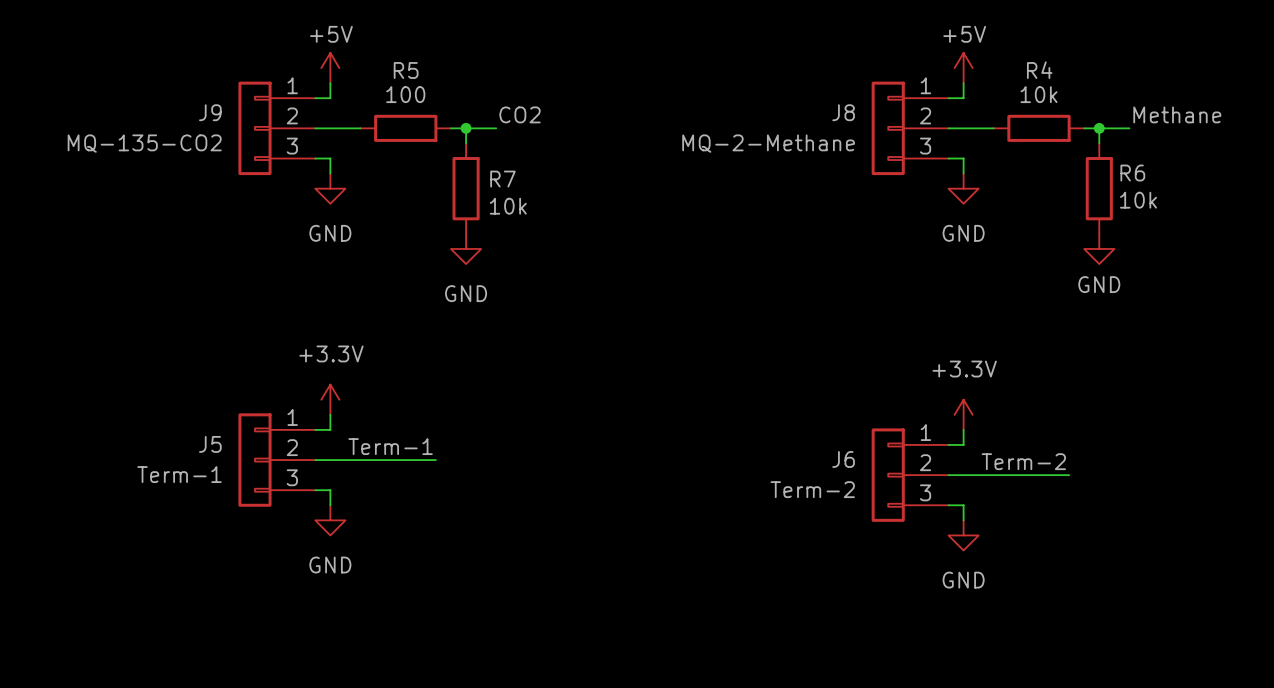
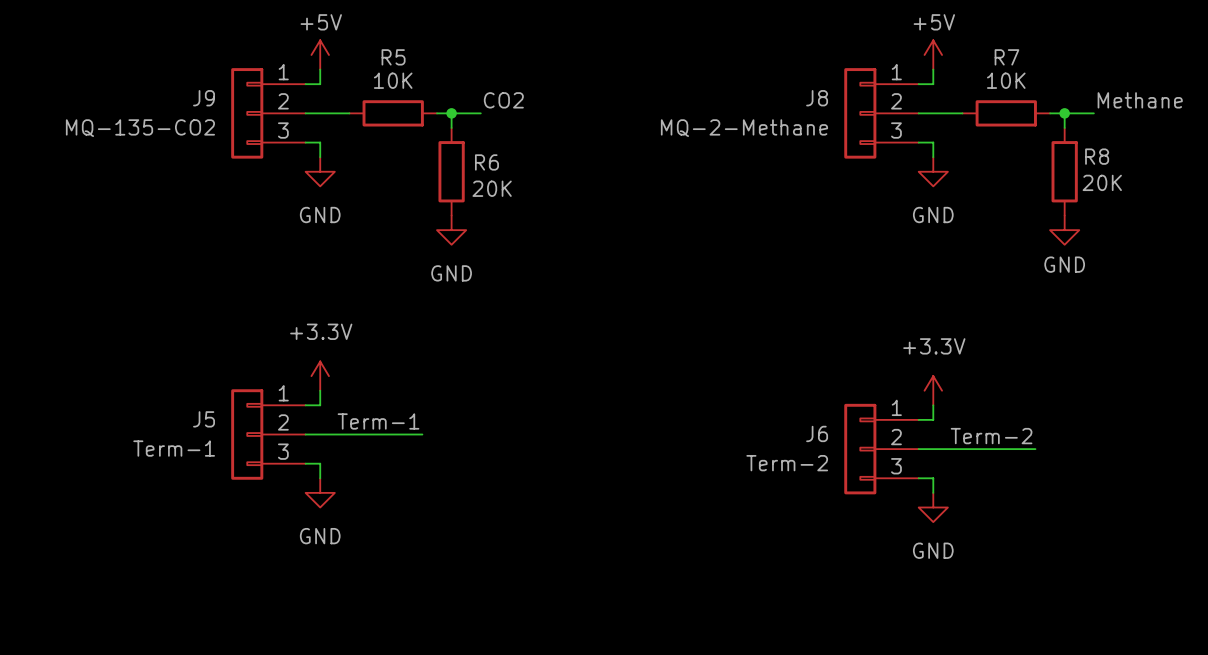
R4 name: R4 (1039, 70) -> R7 (1006, 57)
R5 value: 100 (405, 94) -> 10K (393, 80)
R4 value: 10k (1038, 94) -> 10K (1006, 80)
R6 name: R6 (1132, 173) -> R8 (1097, 156)
R7 name: R7 (502, 179) -> R6 (486, 162)
R6 value: 10k (1138, 200) -> 20K (1102, 182)
R7 value: 10k (508, 206) -> 20K (492, 188)

